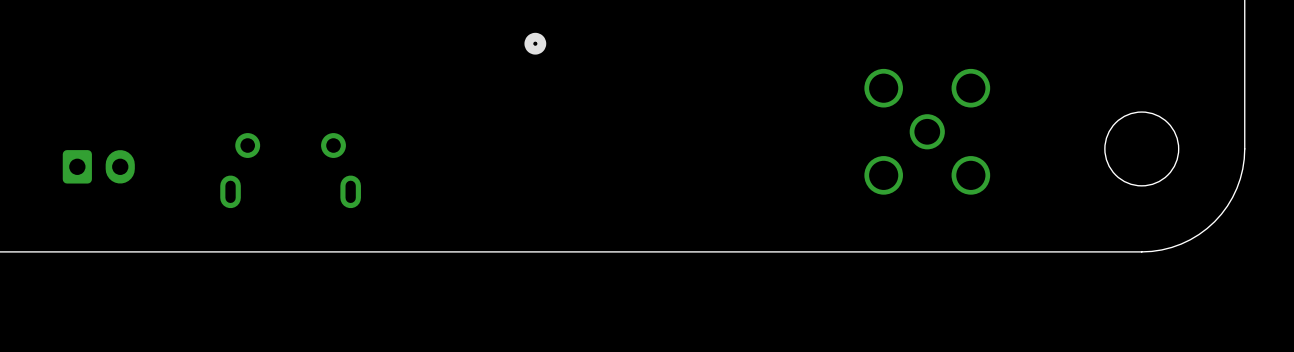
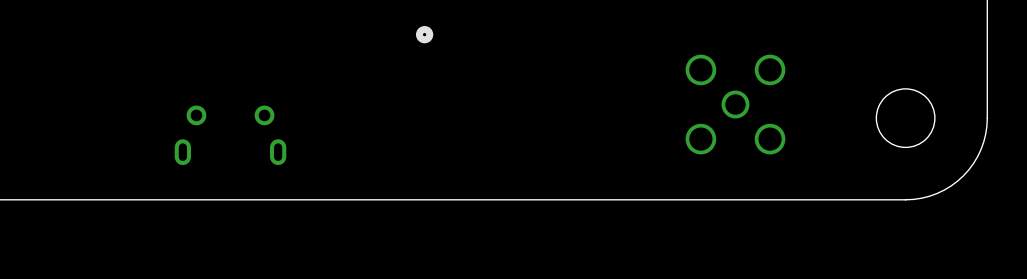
part: (98, 166) -> none

